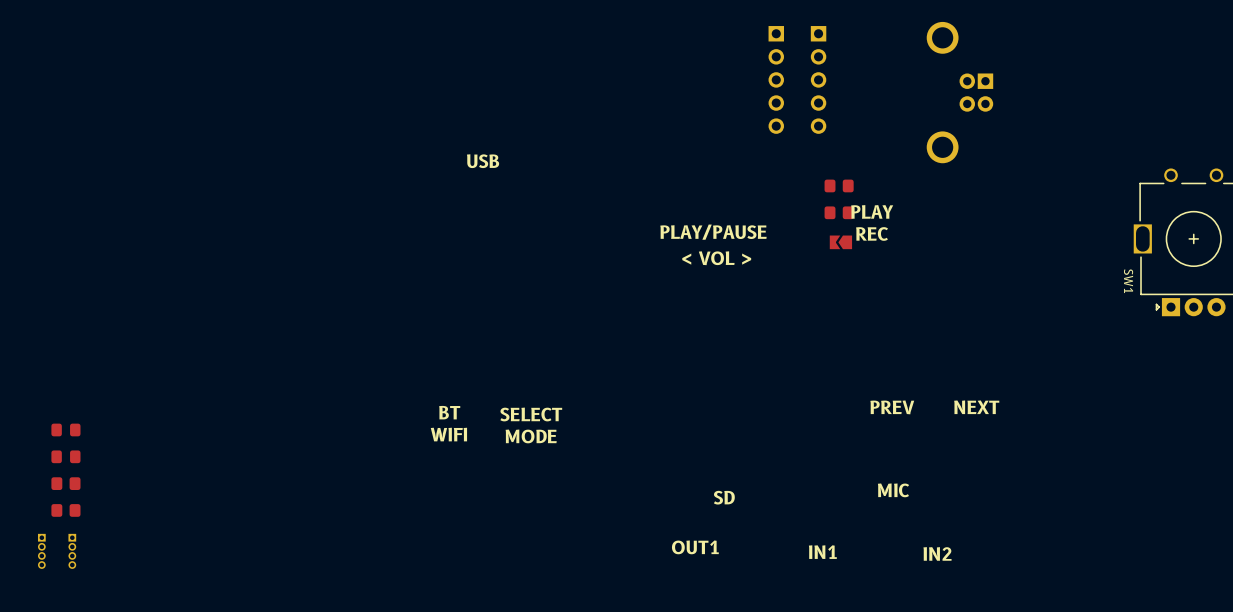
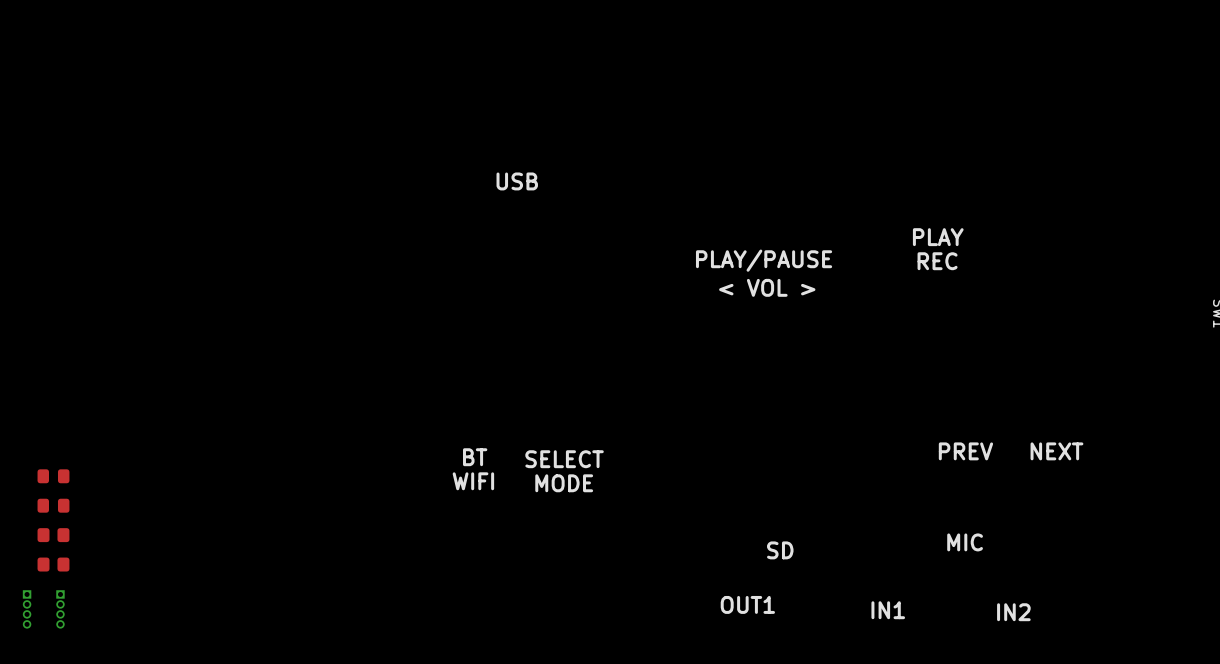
part: (776, 79) -> none
part: (818, 79) -> none
part: (959, 92) -> none
part: (839, 185) -> none
part: (839, 212) -> none
part: (840, 242) -> none

